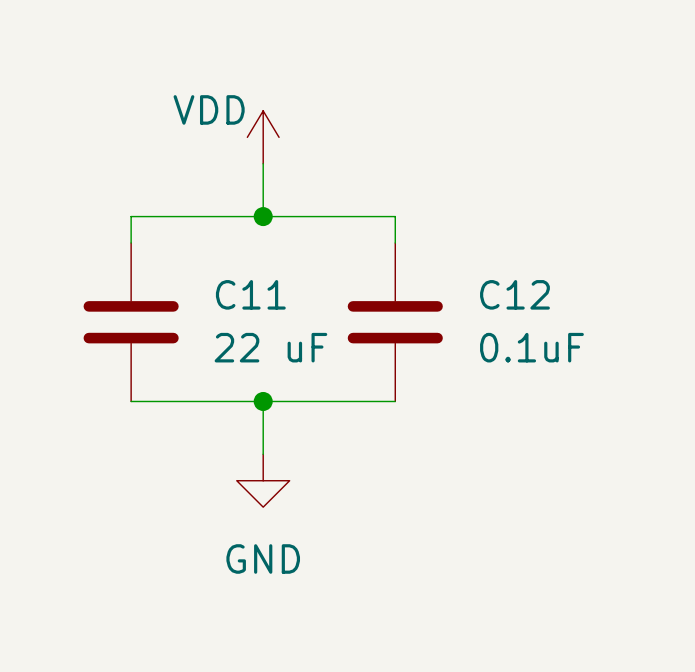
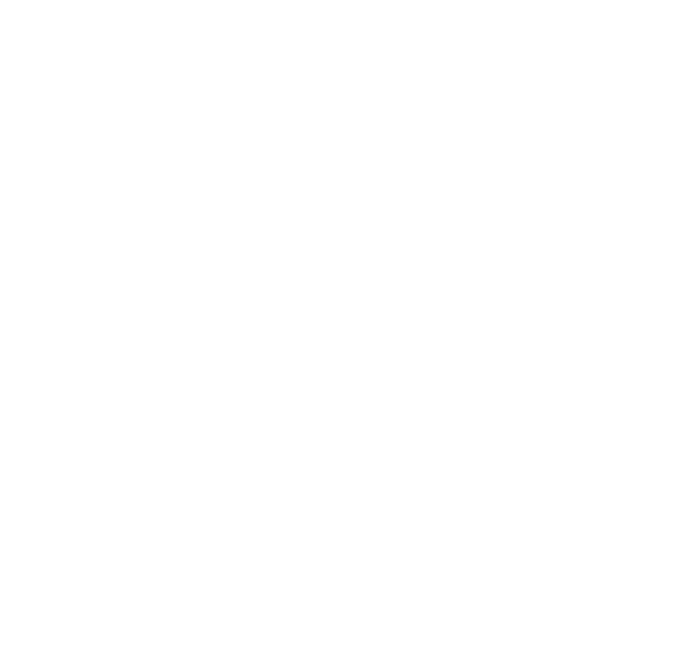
power symbol: VDD (263, 137) -> none
wire: (263, 163) (263, 216) -> none
junction: (263, 216) -> none
wire: (131, 242) (131, 216) (395, 216) (395, 242) -> none
C11: 22 uF (131, 322) -> none
C12: 0.1uF (395, 322) -> none
wire: (131, 401) (395, 401) -> none
wire: (263, 401) (263, 454) -> none
junction: (263, 401) -> none
power symbol: GND (263, 480) -> none

